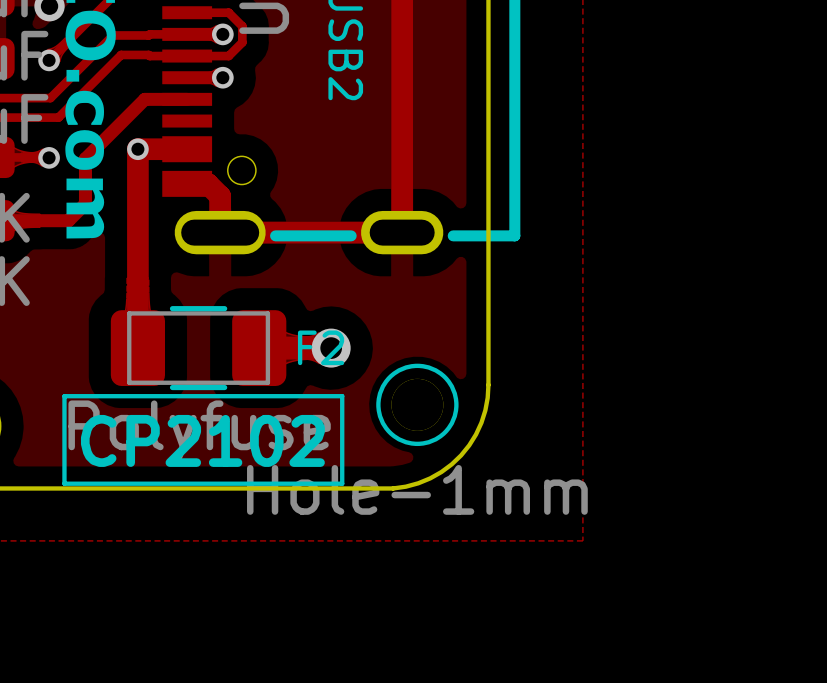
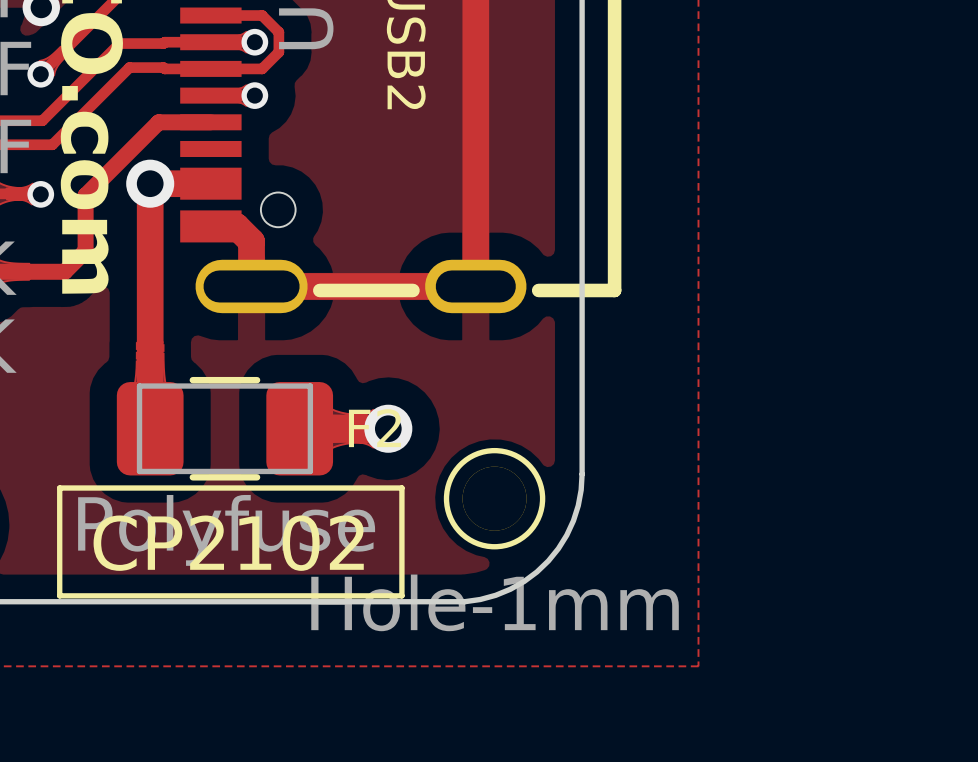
via size: [127, 138, 149, 161] -> [126, 159, 175, 208]

